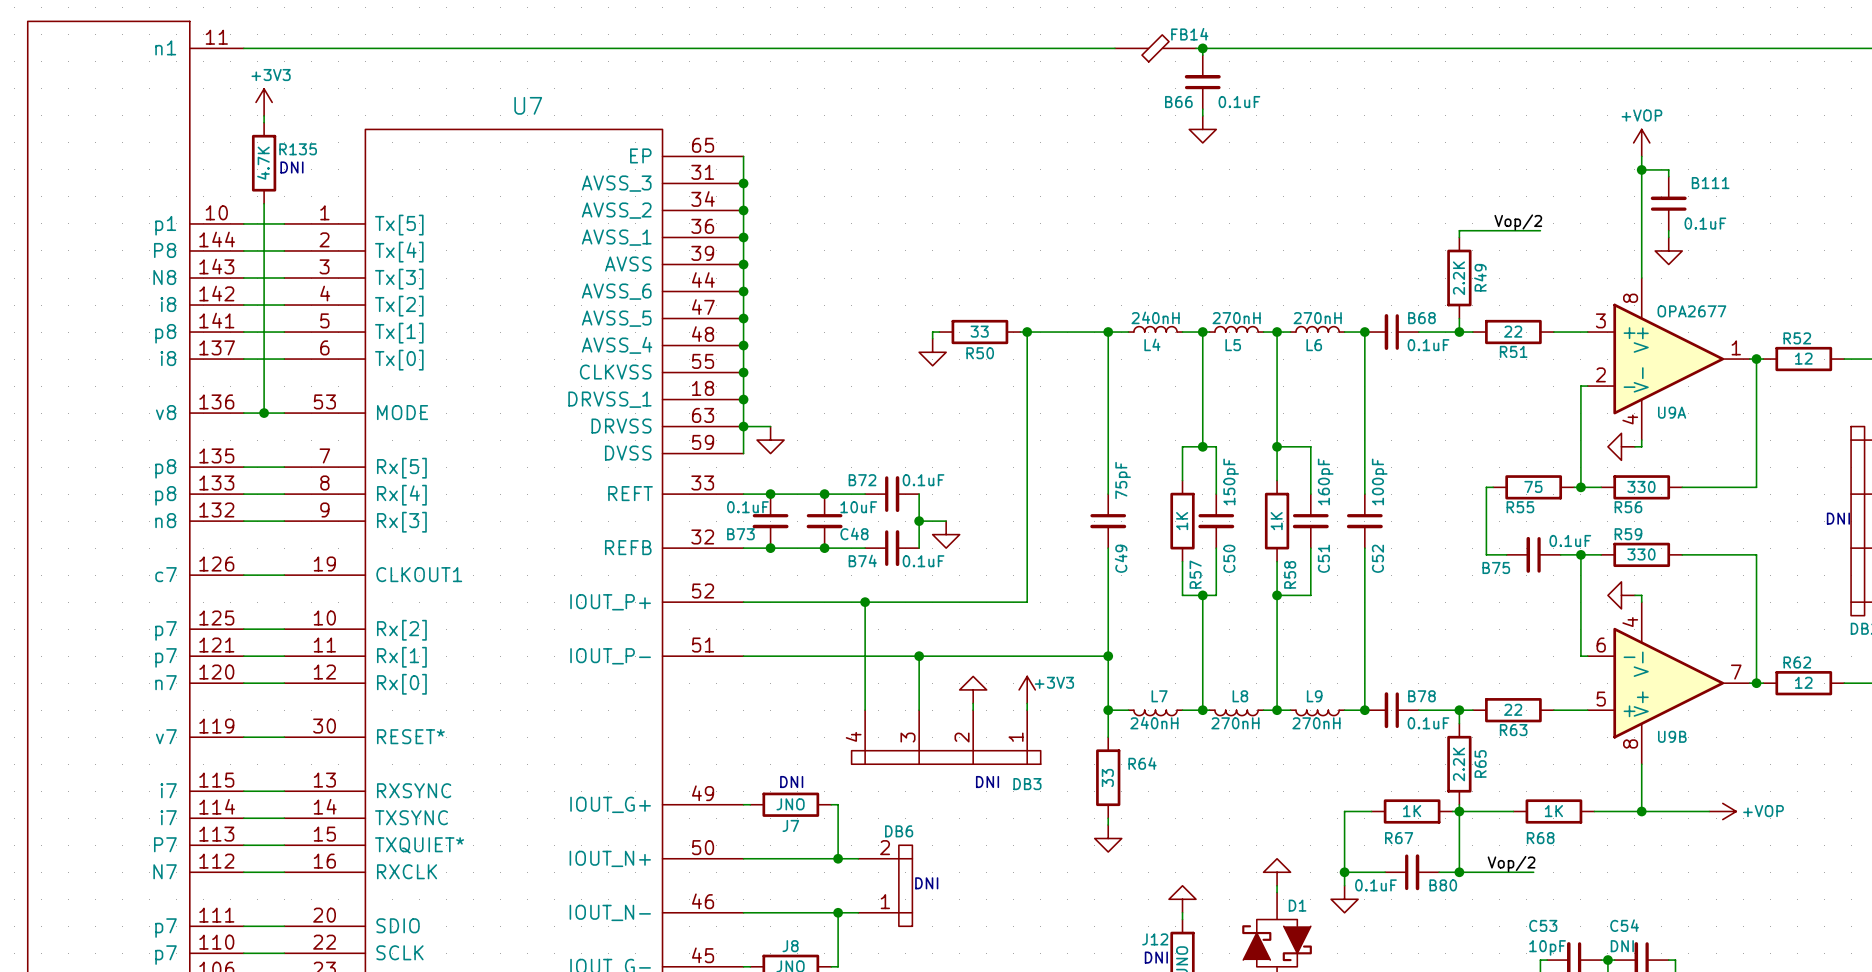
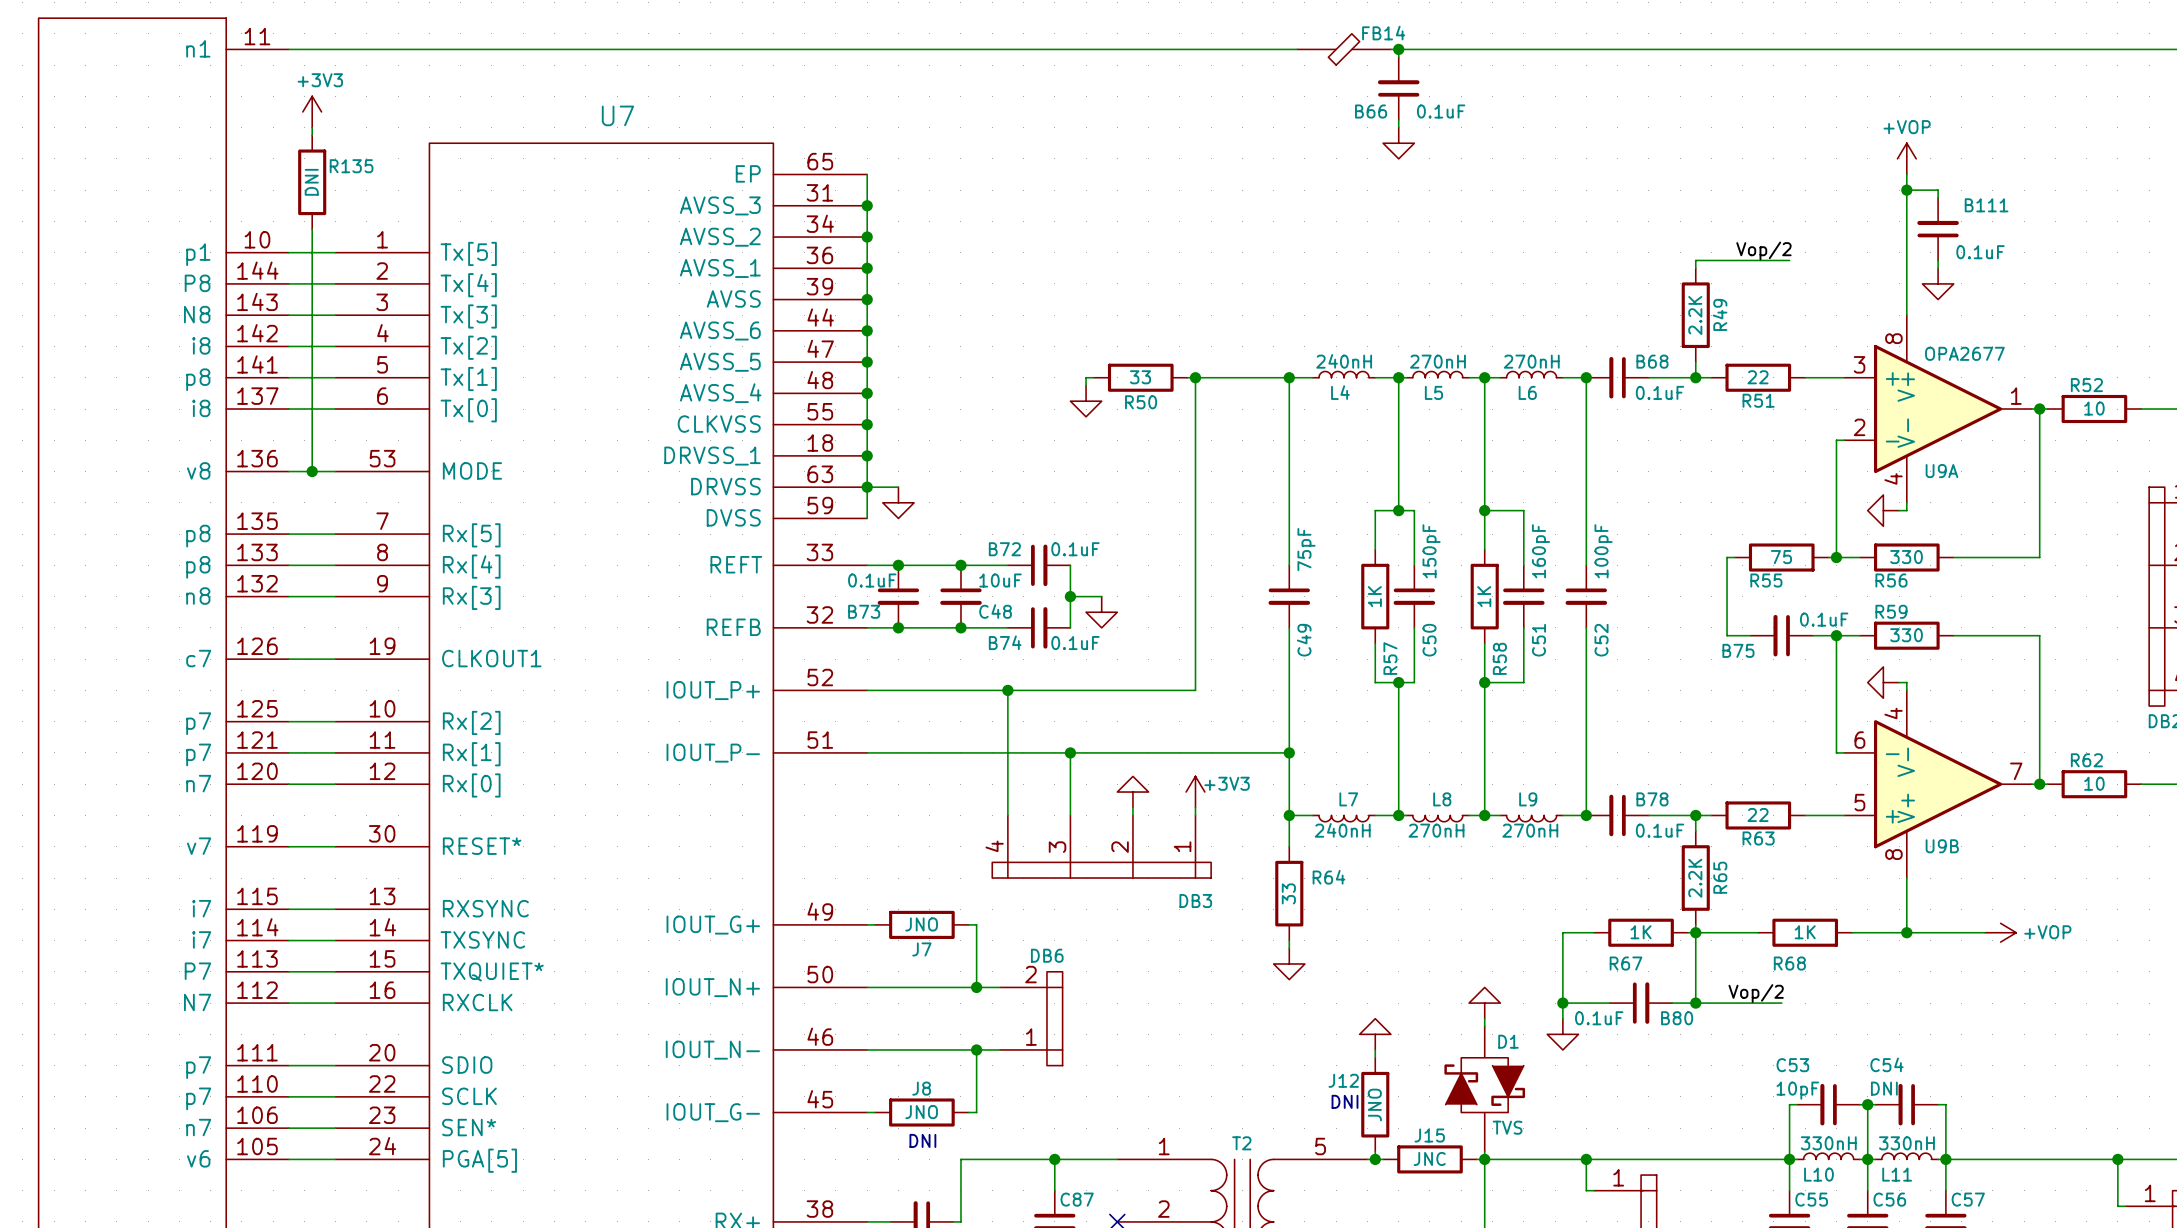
R135 value: 4.7K (263, 163) -> DNI (311, 182)
text: DNI (291, 167) -> none
R52 value: 12 (1803, 358) -> 10 (2094, 408)
text: DNI (1838, 518) -> none
R62 value: 12 (1803, 682) -> 10 (2094, 783)
text: DNI (791, 782) -> none
text: DNI (987, 782) -> none
text: DNI (926, 883) -> none

